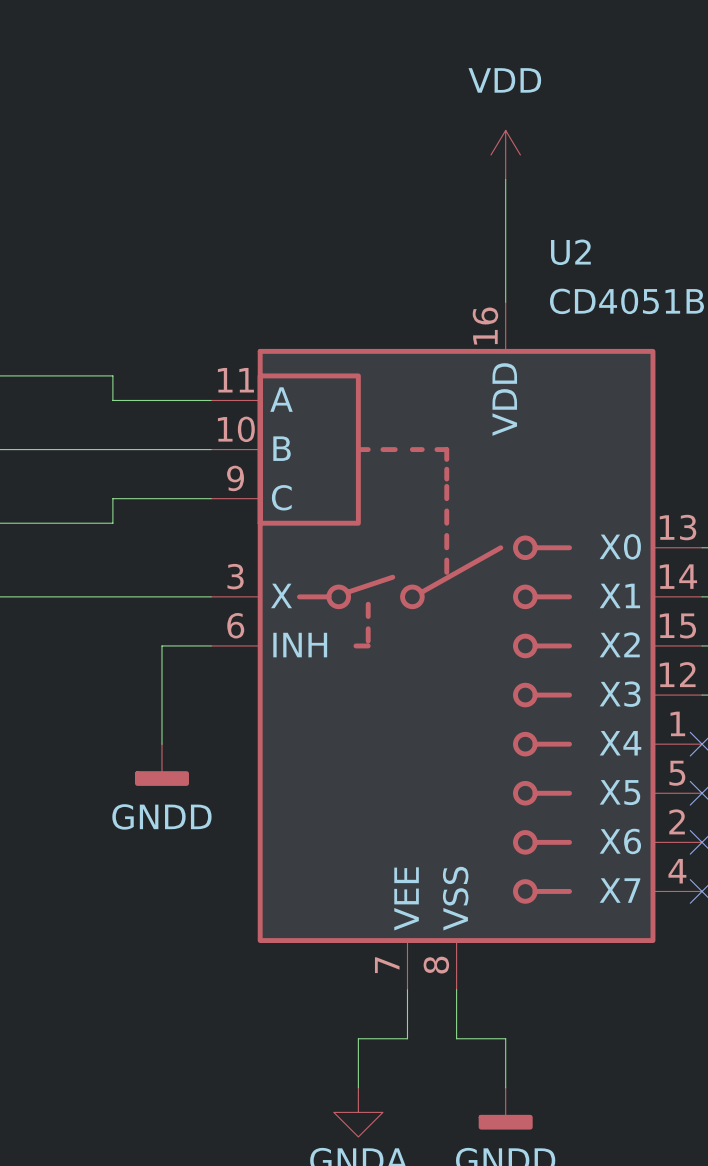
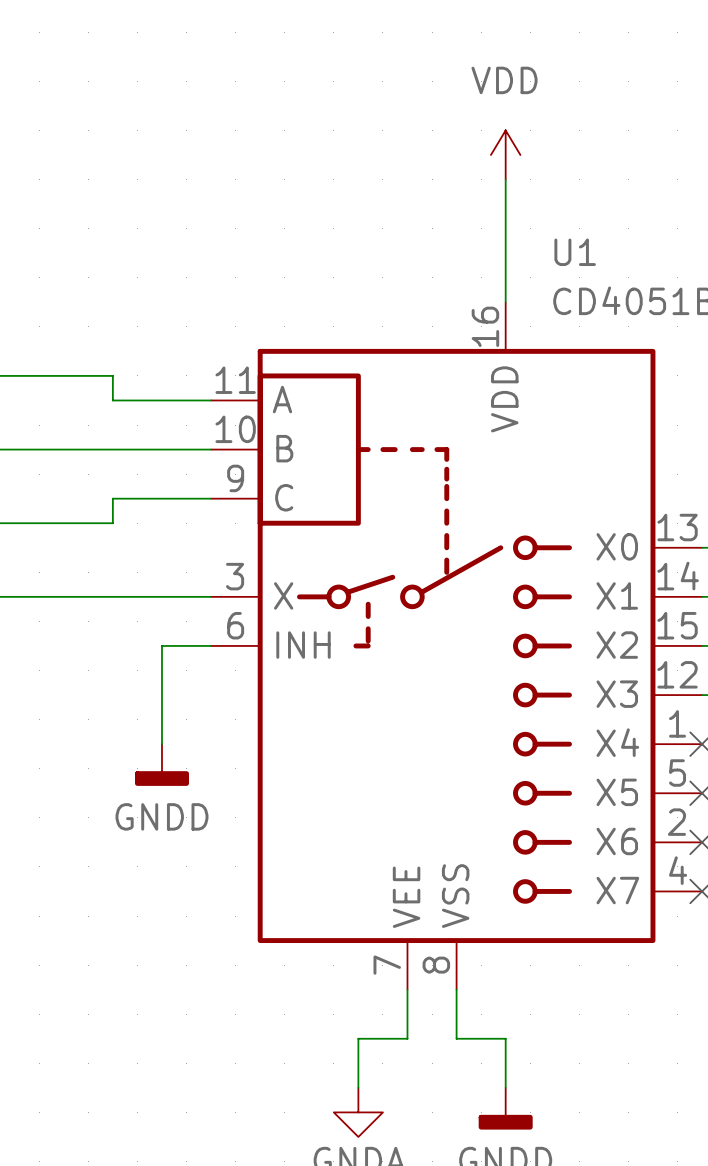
U2 name: U2 (570, 252) -> U1 (575, 252)

